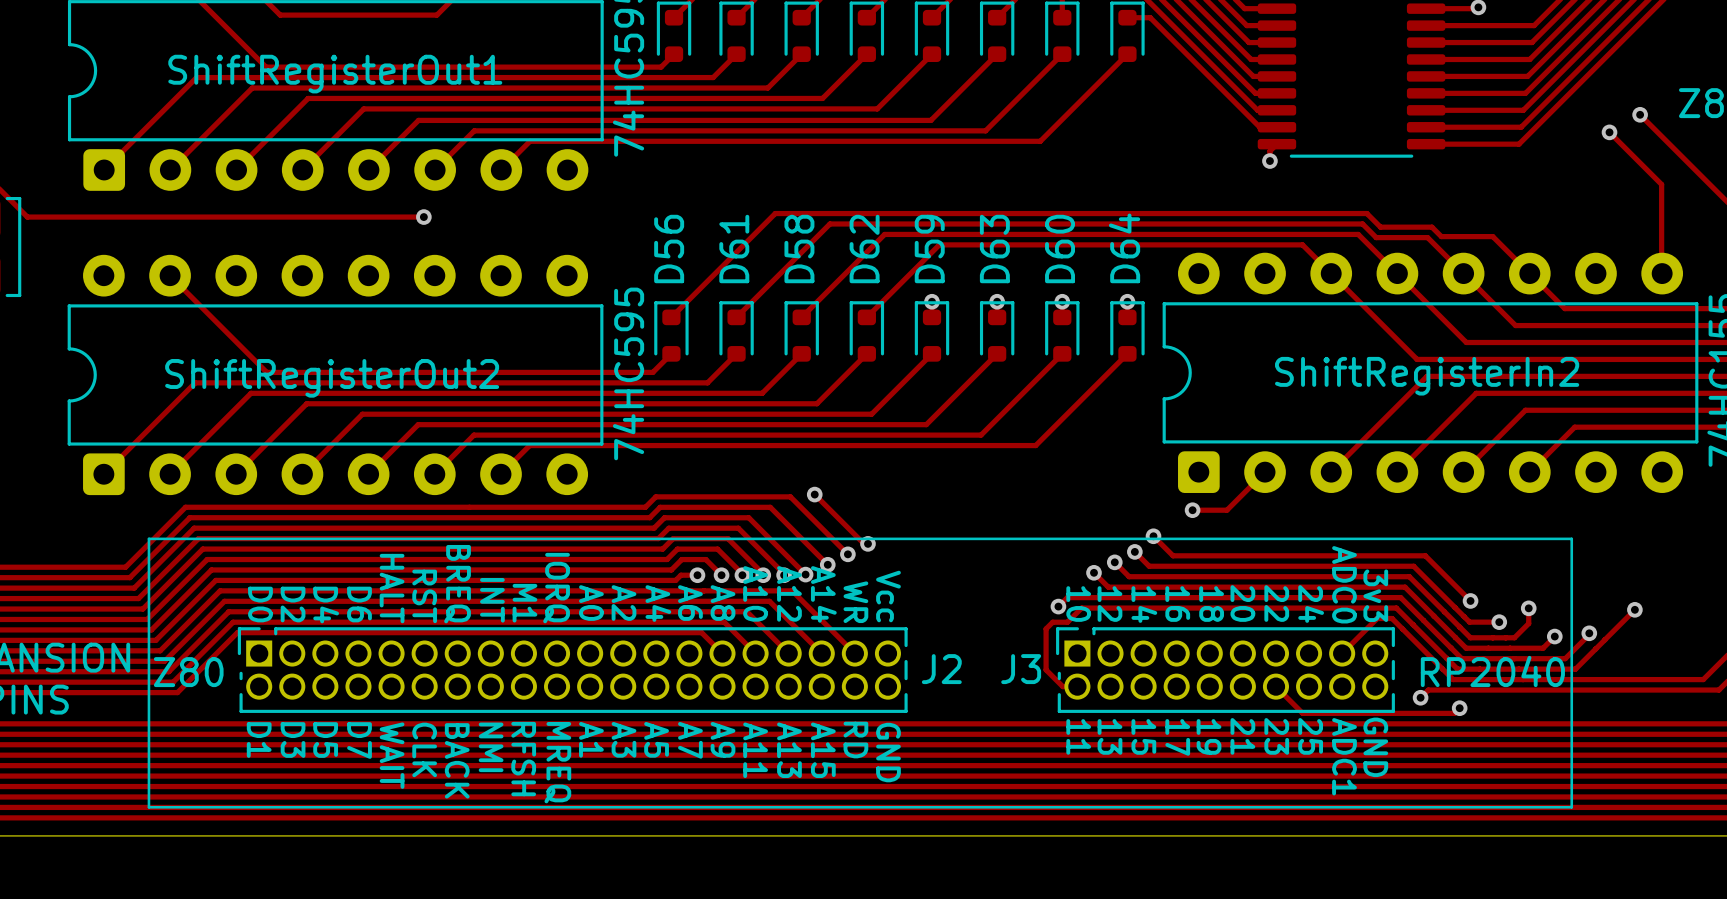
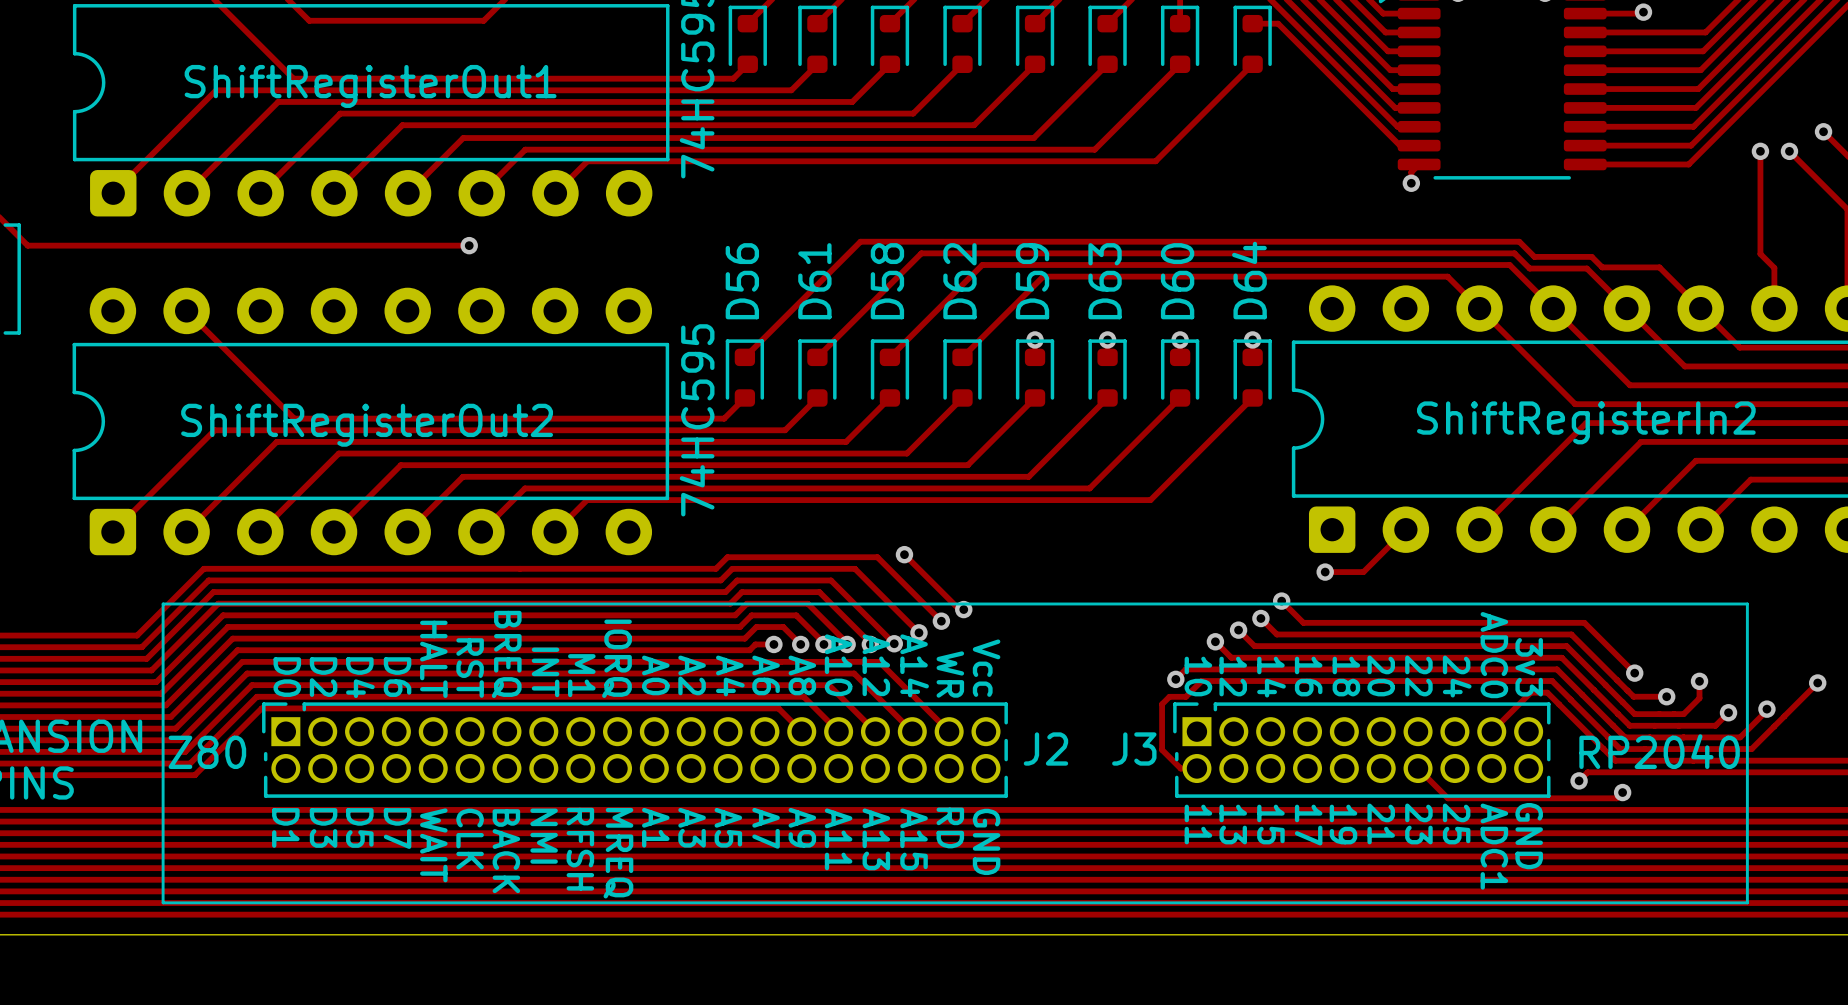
track: none -> (1760, 151) (1760, 254) (1774, 267) (1774, 308)
via: none -> (1760, 151)

